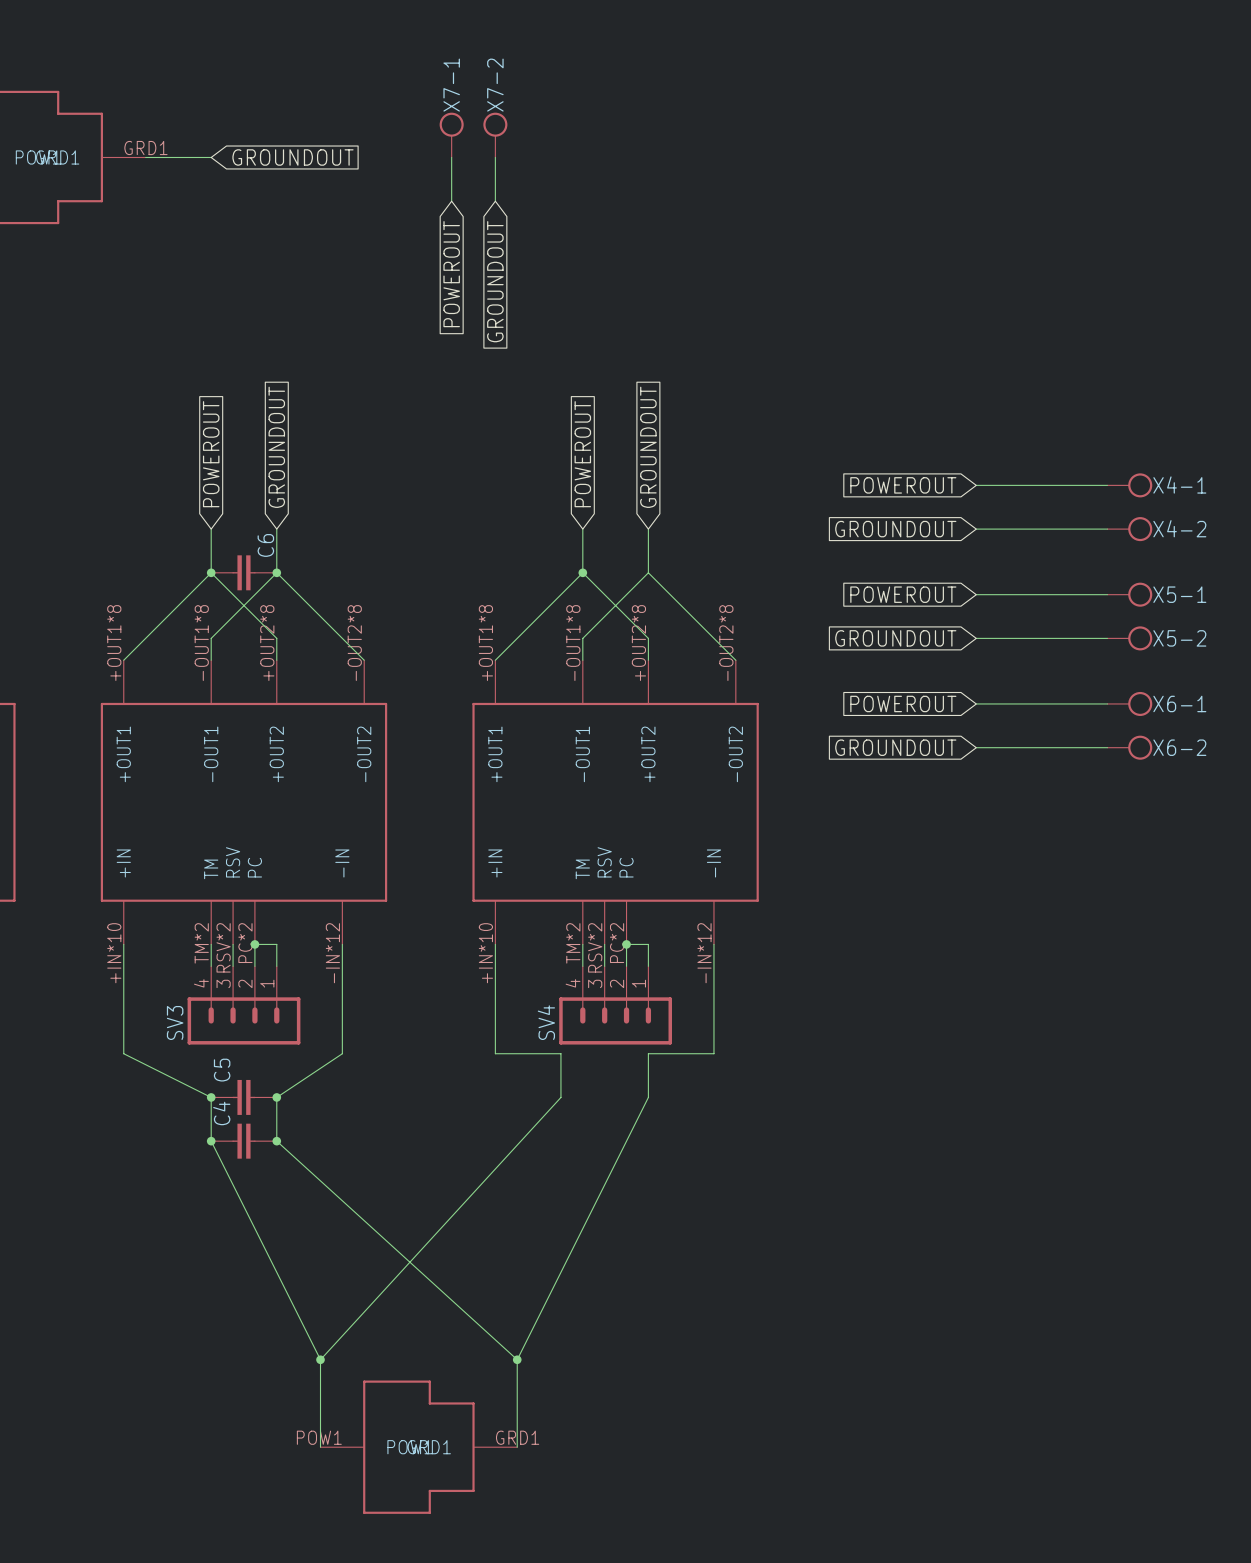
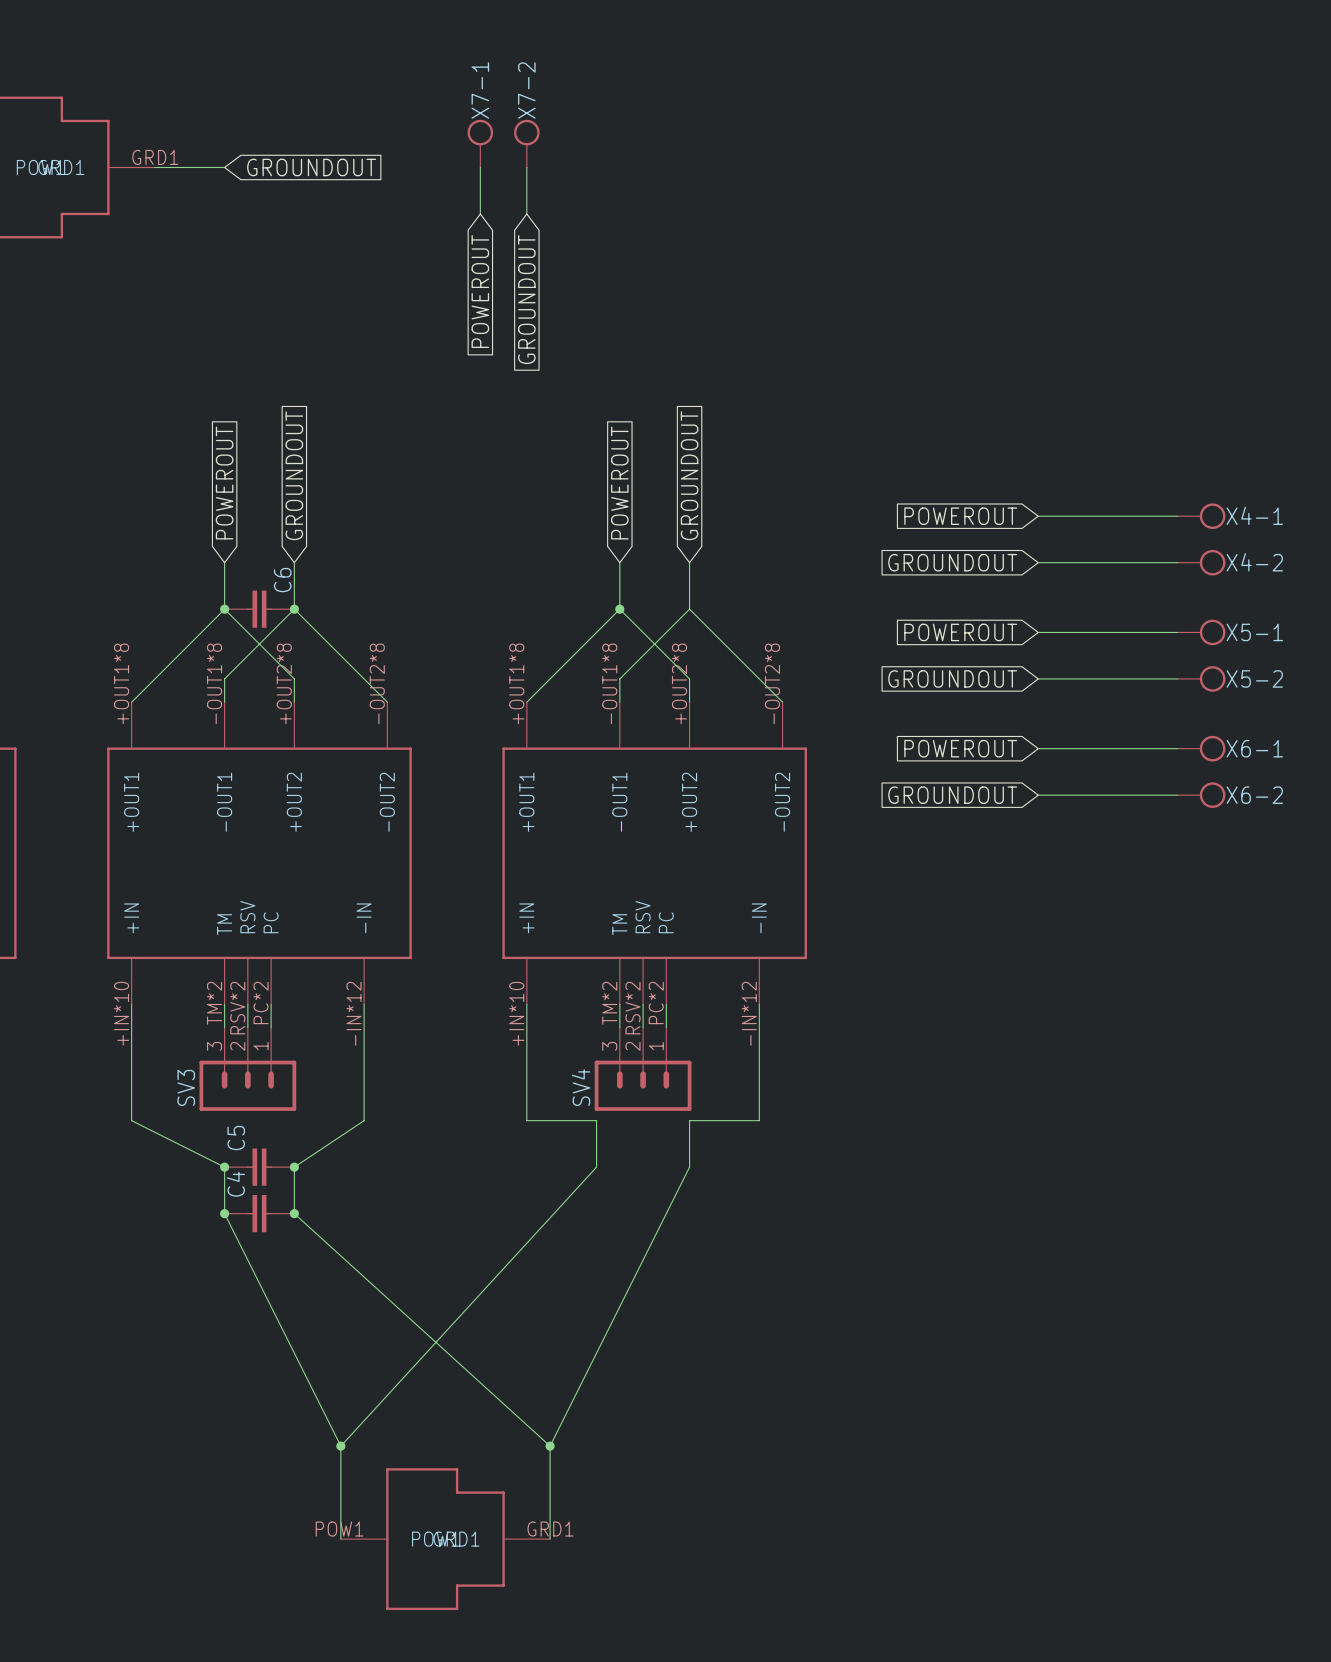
wire: (254, 944) (276, 944) (276, 966) -> none
junction: (254, 944) -> none
wire: (626, 944) (648, 944) (648, 966) -> none
junction: (626, 944) -> none
SV3 symbol: [187, 966, 301, 1045] -> [199, 1027, 297, 1111]
SV4 symbol: [559, 966, 673, 1045] -> [594, 1027, 692, 1111]

